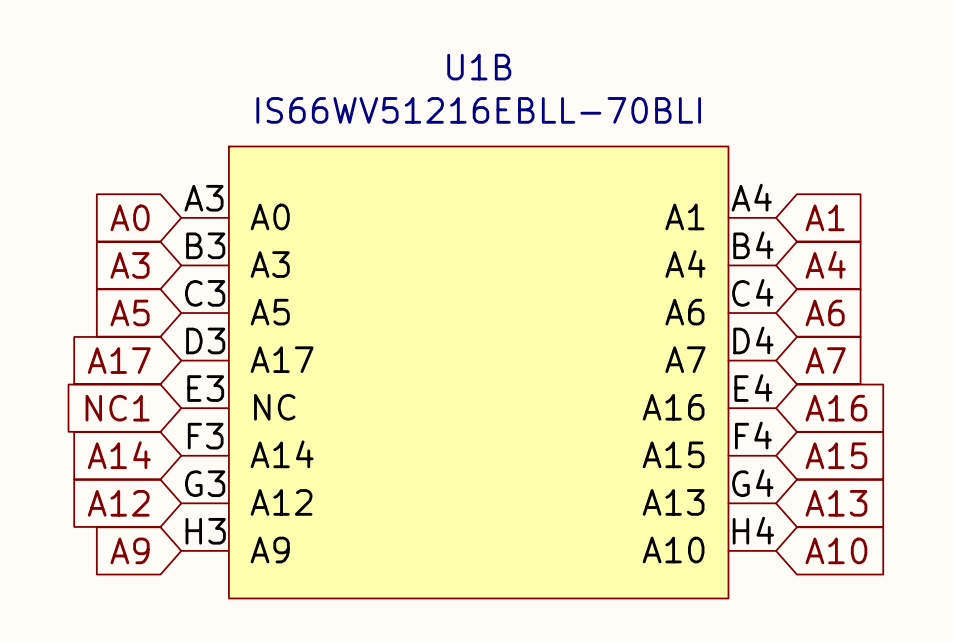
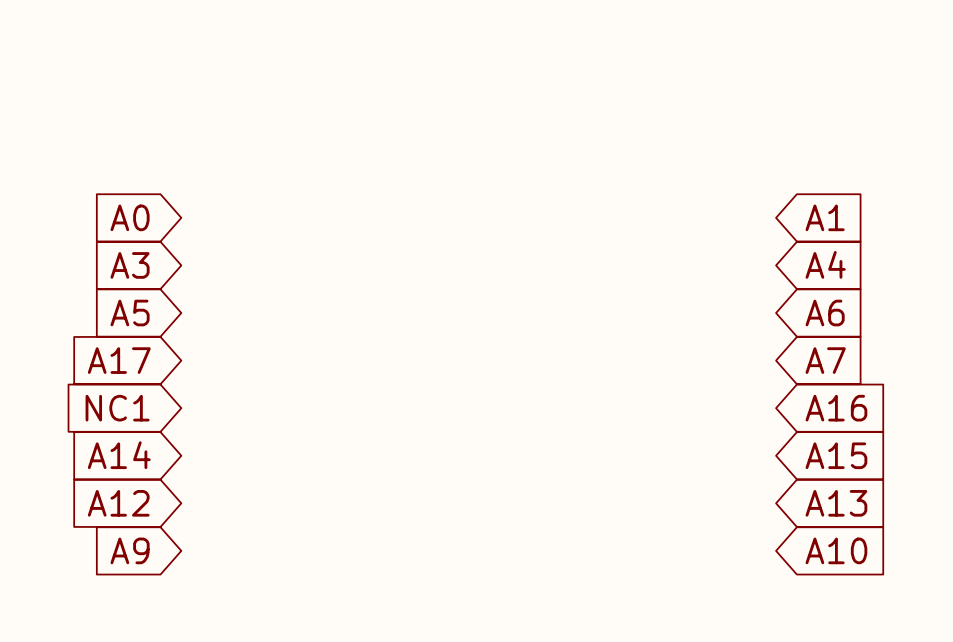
U1B: IS66WV51216EBLL-70BLI (478, 372) -> none

